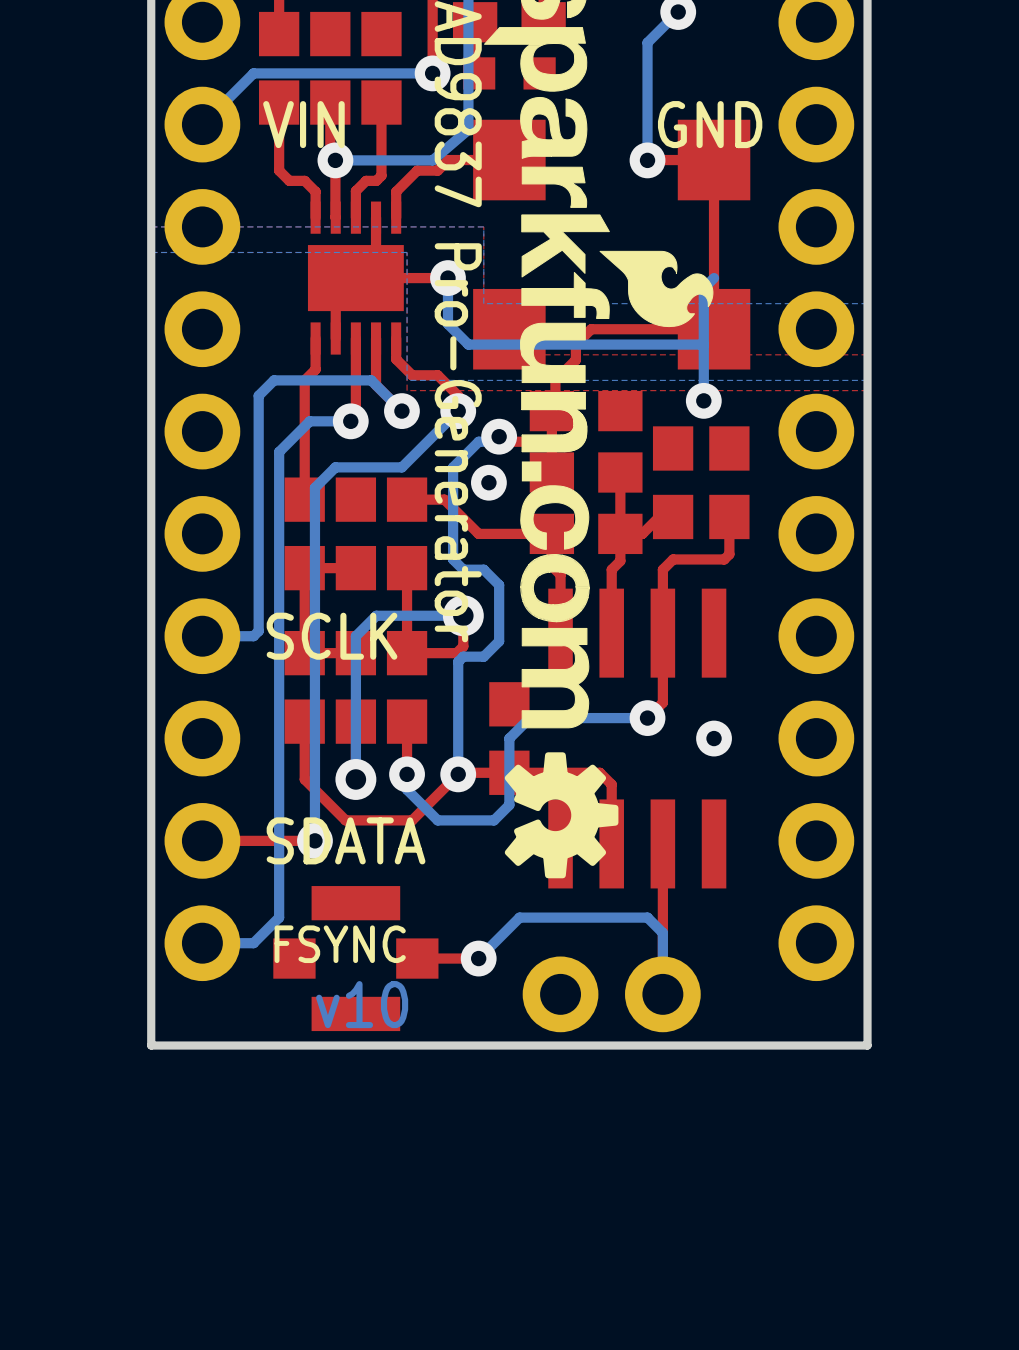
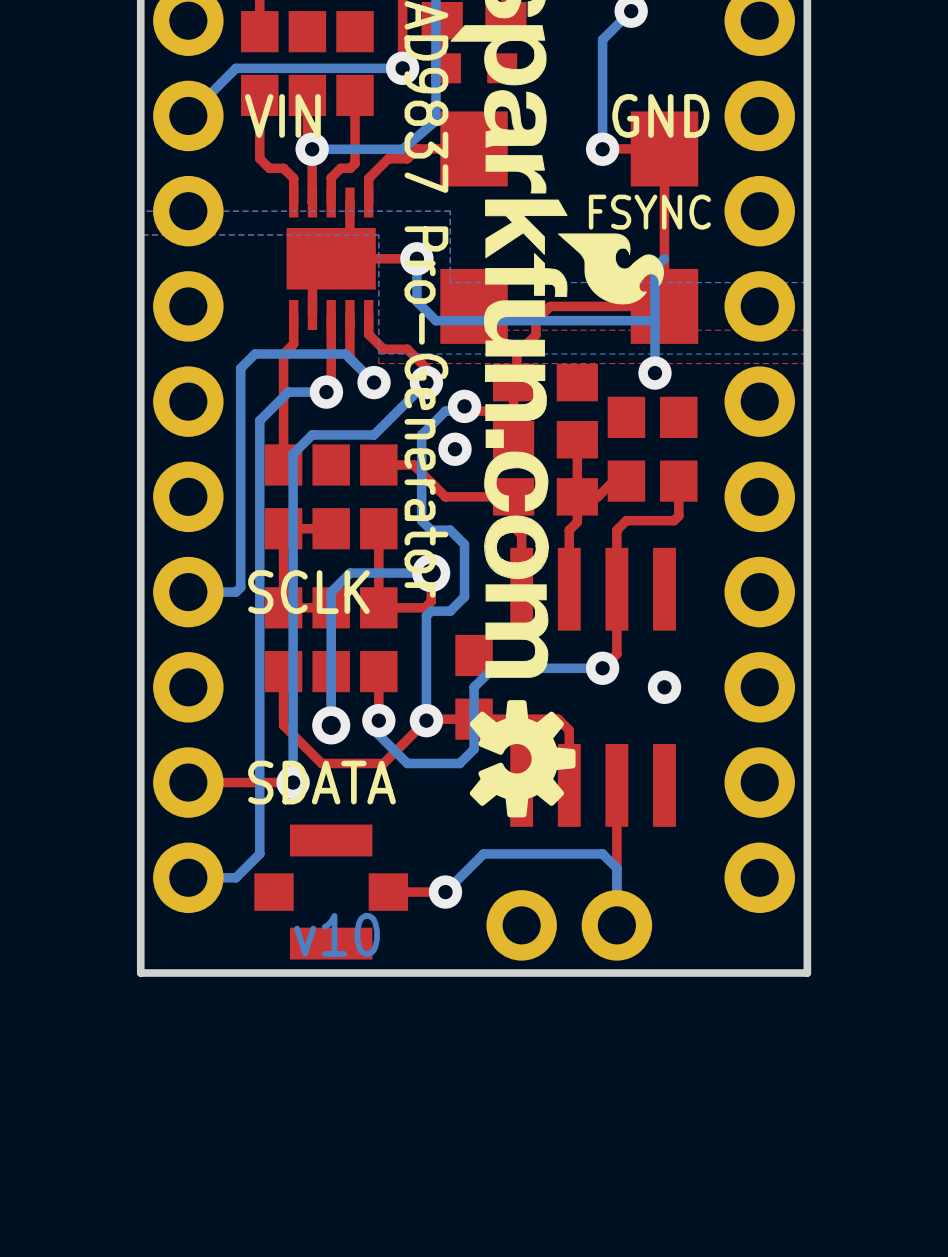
text position: FSYNC (340, 944) -> FSYNC (649, 212)

